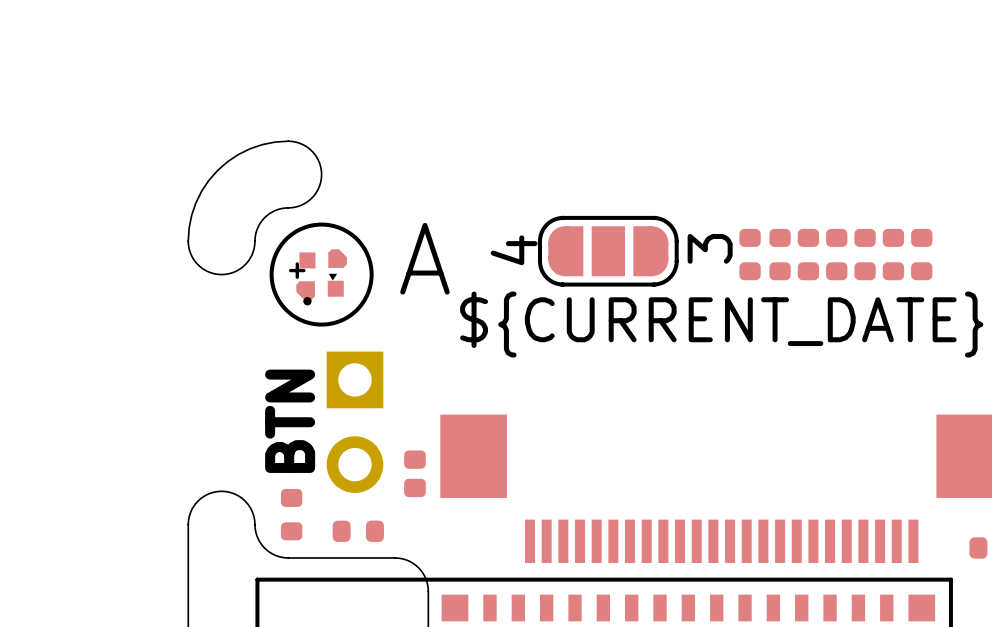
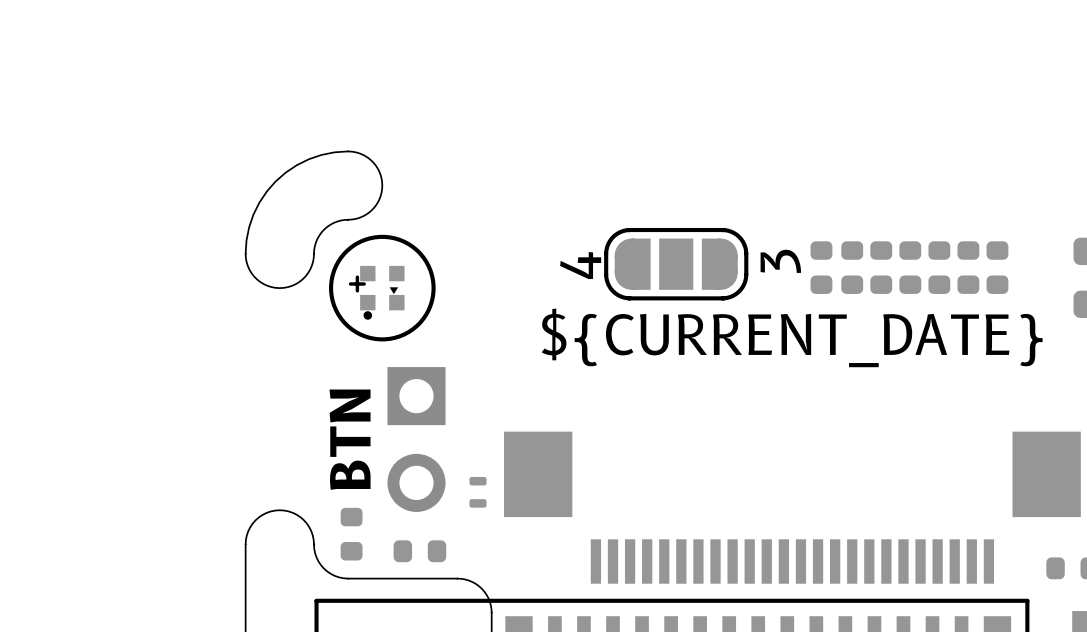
part footprint: [288, 249, 347, 306] -> [348, 265, 405, 320]
text: A (424, 258) -> none
part footprint: [404, 450, 426, 498] -> [469, 476, 487, 508]

